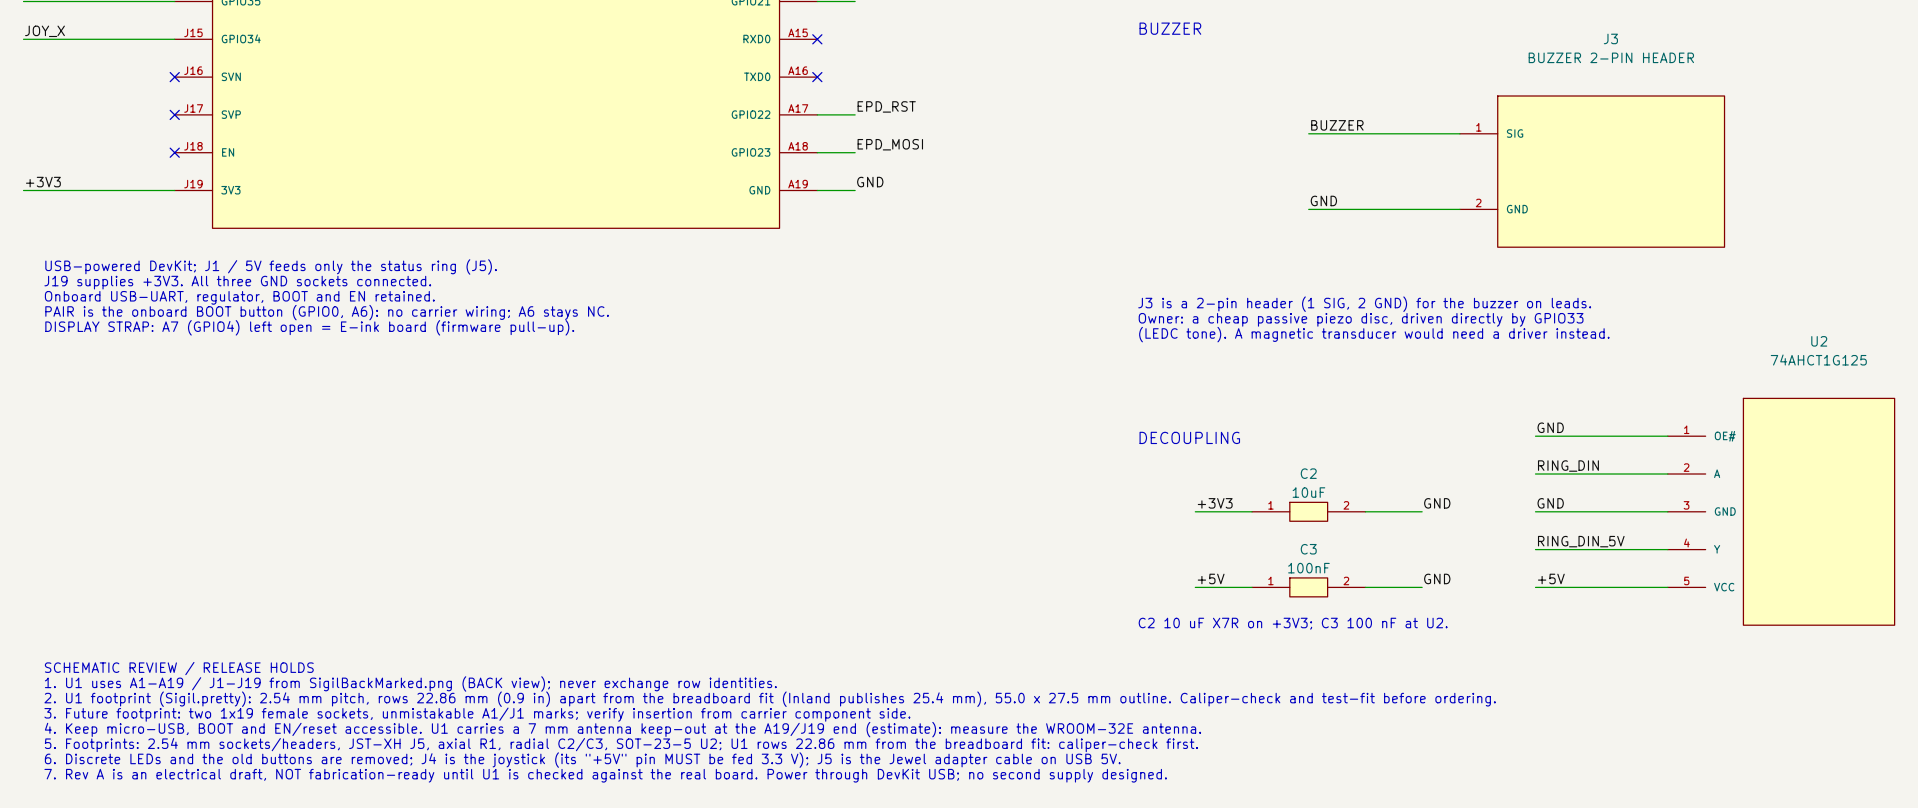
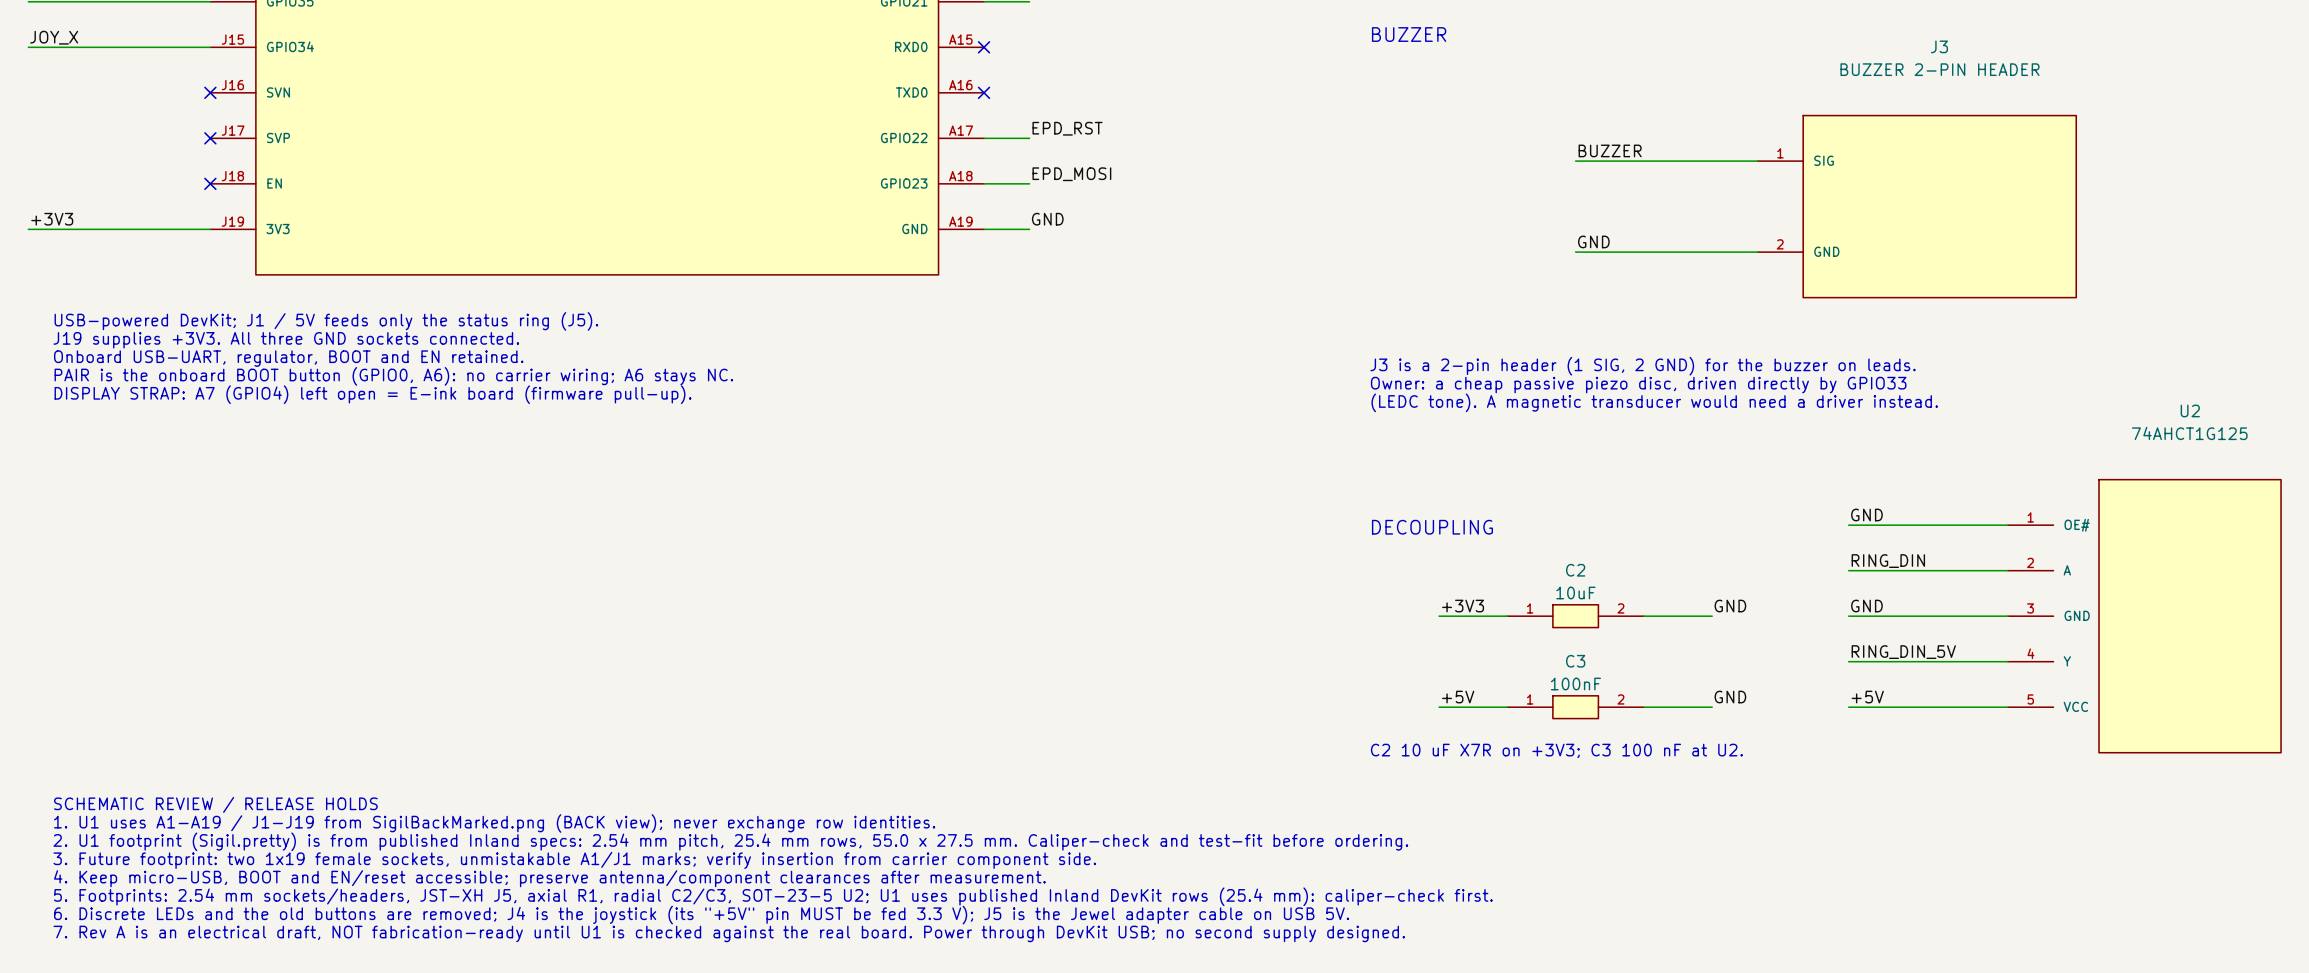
text: 2. U1 footprint (Sigil.pretty): 2.54 mm pitch, rows 22.86 mm (0.9 in) apart from the breadboard fit (Inland publishes 25.4 mm), 55.0 x 27.5 mm outline. Caliper-check and test-fit before ordering. (770, 699) -> 2. U1 footprint (Sigil.pretty) is from published Inland specs: 2.54 mm pitch, 25.4 mm rows, 55.0 x 27.5 mm. Caliper-check and test-fit before ordering. (730, 841)
text: 4. Keep micro-USB, BOOT and EN/reset accessible. U1 carries a 7 mm antenna keep-out at the A19/J19 end (estimate): measure the WROOM-32E antenna. (623, 729) -> 4. Keep micro-USB, BOOT and EN/reset accessible; preserve antenna/component clearances after measurement. (549, 878)
text: 5. Footprints: 2.54 mm sockets/headers, JST-XH J5, axial R1, radial C2/C3, SOT-23-5 U2; U1 rows 22.86 mm from the breadboard fit: caliper-check first. (621, 745) -> 5. Footprints: 2.54 mm sockets/headers, JST-XH J5, axial R1, radial C2/C3, SOT-23-5 U2; U1 uses published Inland DevKit rows (25.4 mm): caliper-check first. (773, 896)

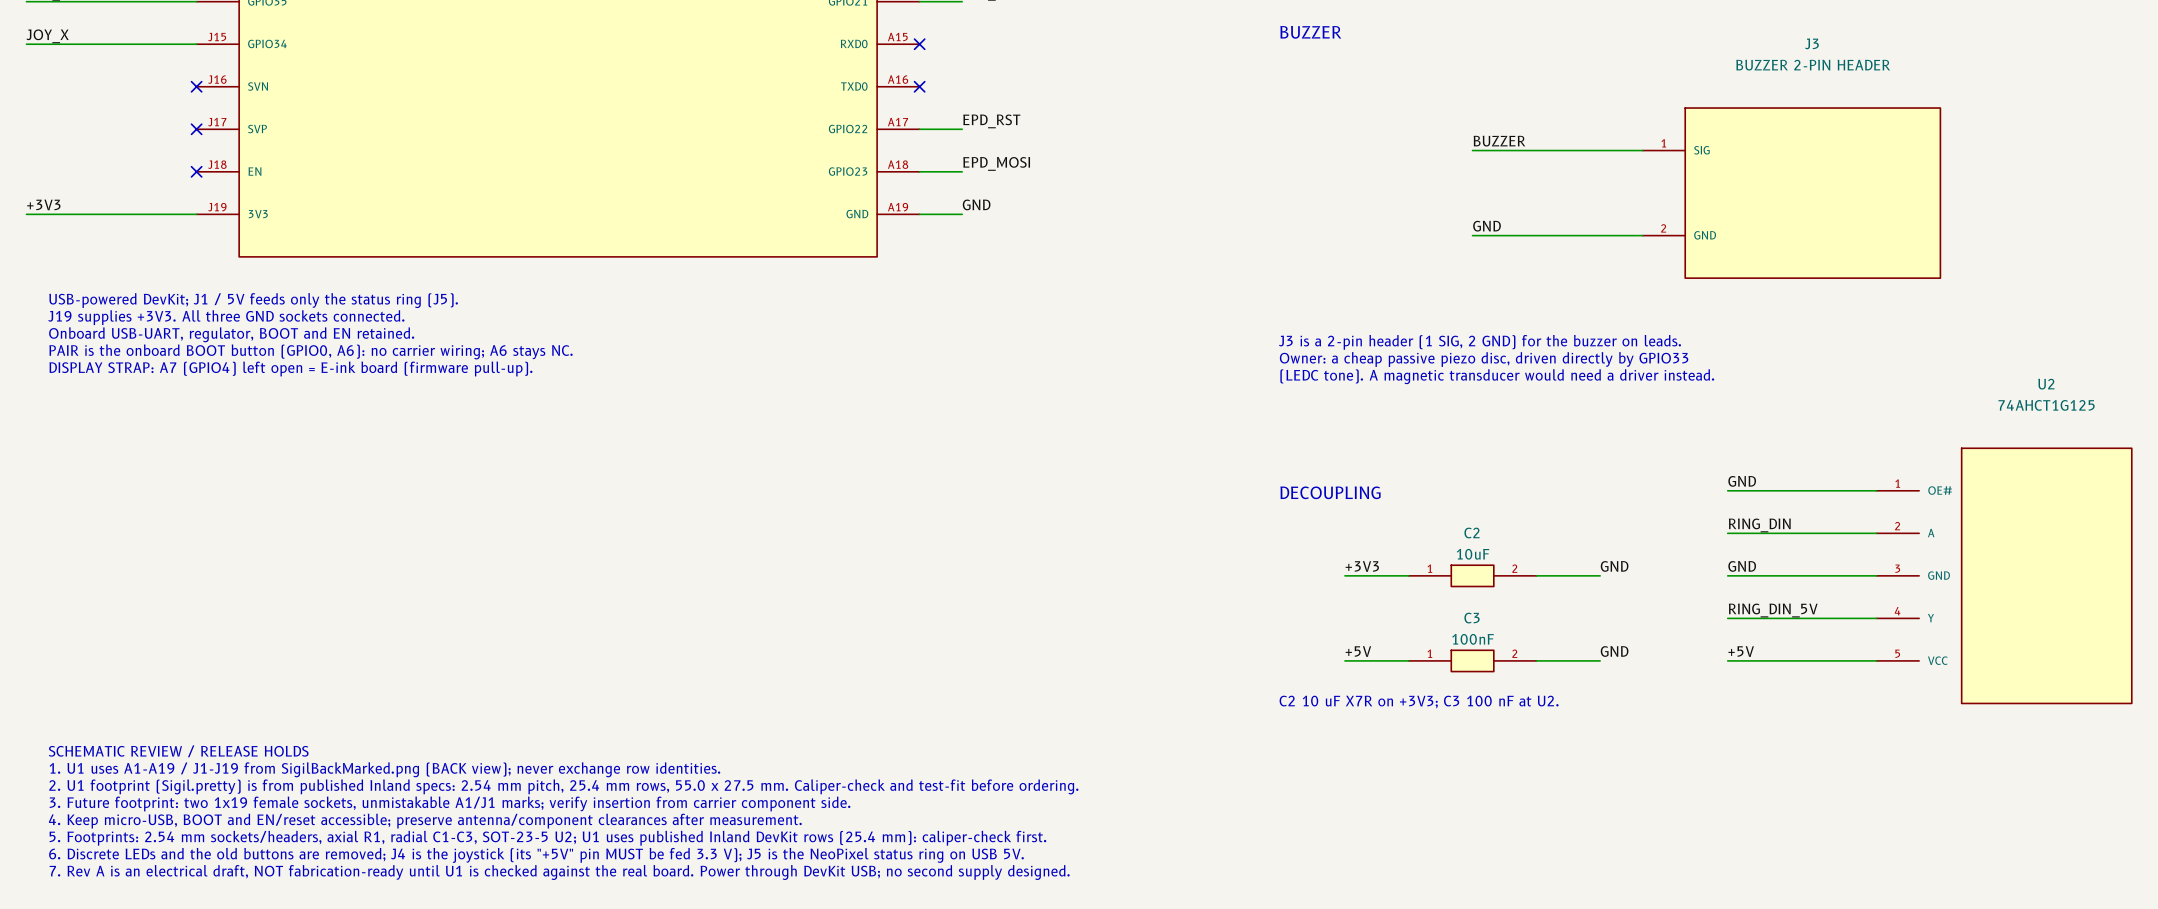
text: 5. Footprints: 2.54 mm sockets/headers, JST-XH J5, axial R1, radial C2/C3, SOT-23-5 U2; U1 uses published Inland DevKit rows (25.4 mm): caliper-check first. (773, 896) -> 5. Footprints: 2.54 mm sockets/headers, axial R1, radial C1-C3, SOT-23-5 U2; U1 uses published Inland DevKit rows (25.4 mm): caliper-check first. (547, 838)
text: 6. Discrete LEDs and the old buttons are removed; J4 is the joystick (its "+5V" pin MUST be fed 3.3 V); J5 is the Jewel adapter cable on USB 5V. (701, 915) -> 6. Discrete LEDs and the old buttons are removed; J4 is the joystick (its "+5V" pin MUST be fed 3.3 V); J5 is the NeoPixel status ring on USB 5V. (536, 855)

